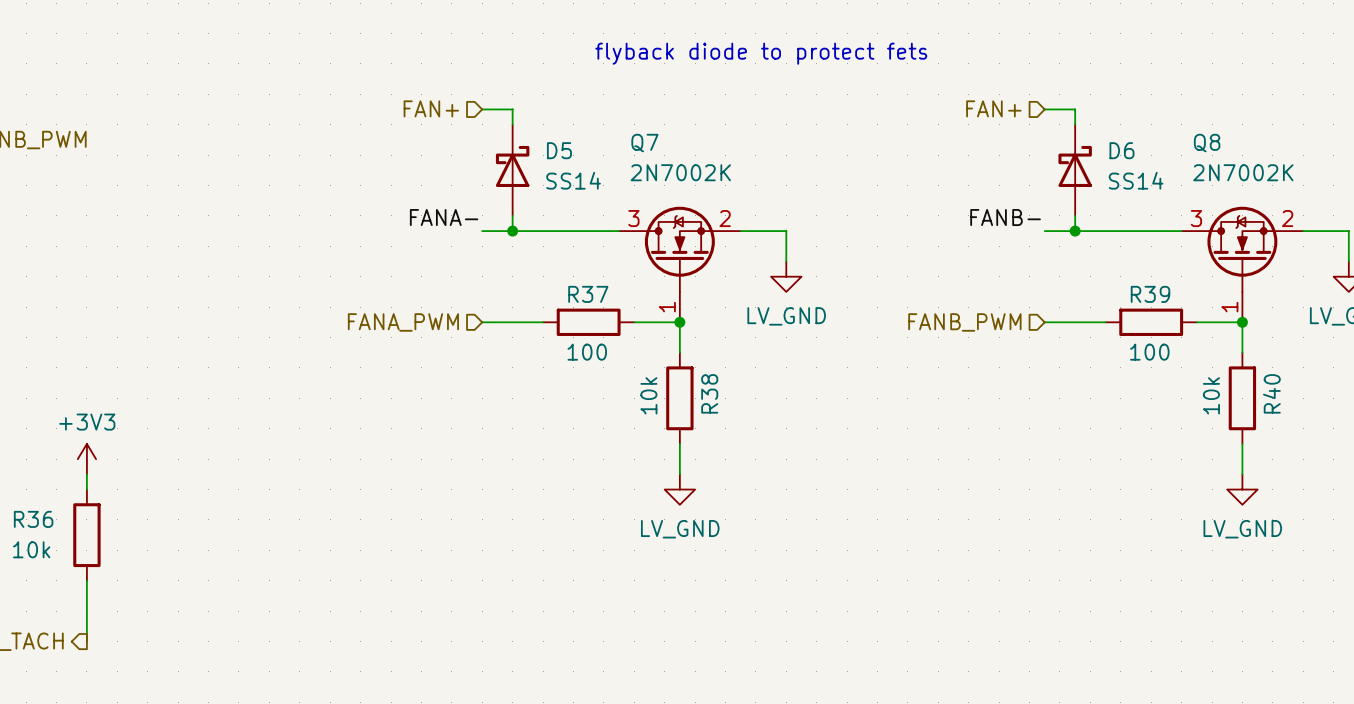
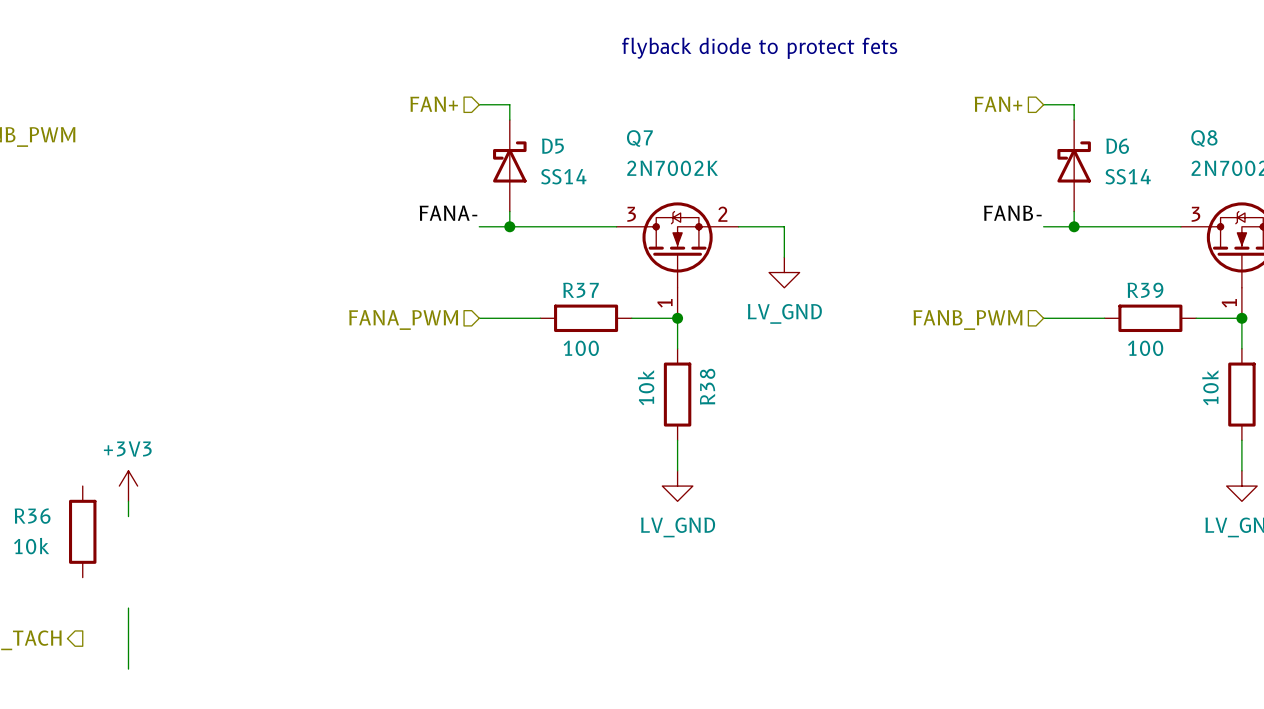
power symbol position: +3V3 (86, 459) -> +3V3 (128, 486)
wire: (86, 474) (86, 489) -> (128, 501) (128, 516)
wire: (86, 580) (86, 641) -> (128, 608) (128, 669)

